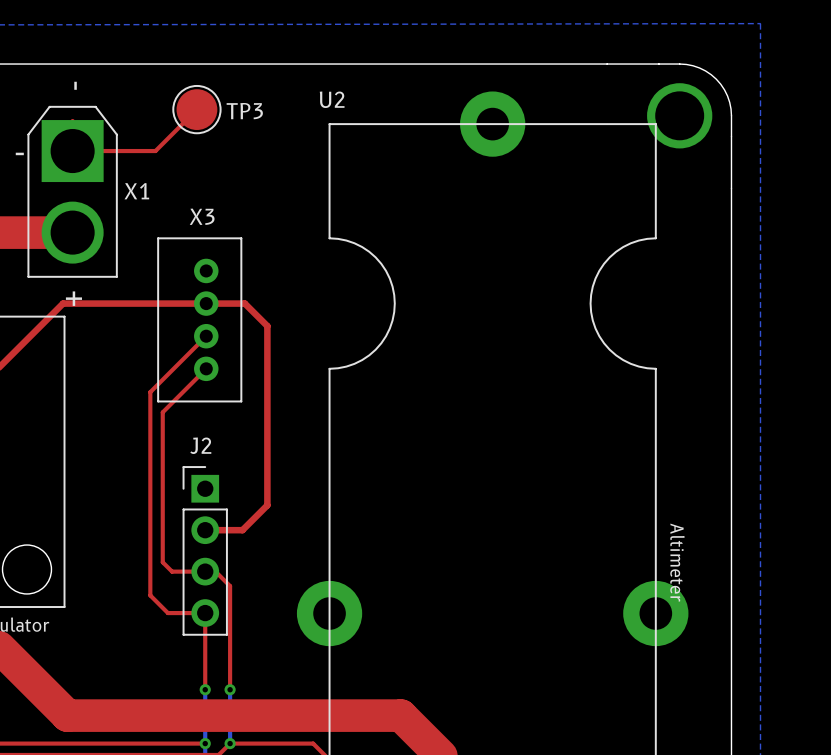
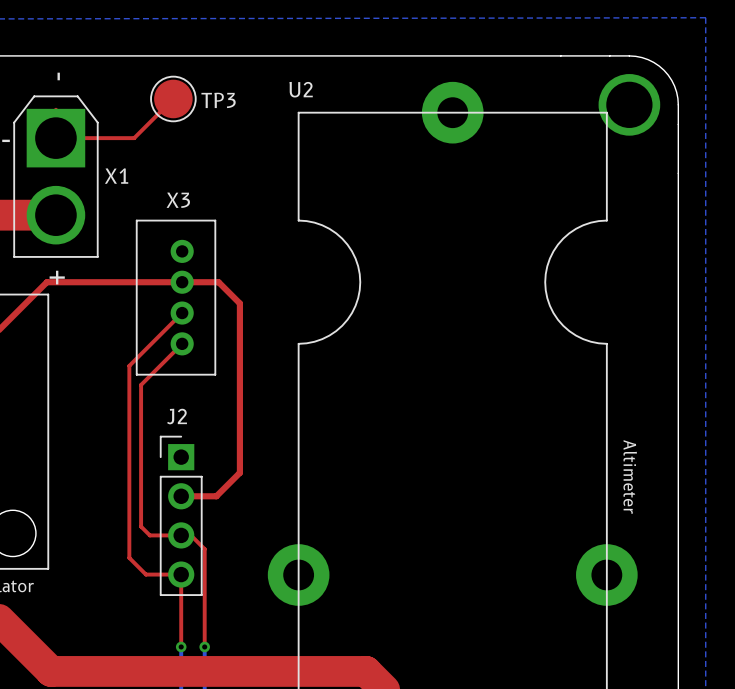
text position: Altimeter (677, 562) -> Altimeter (630, 476)

